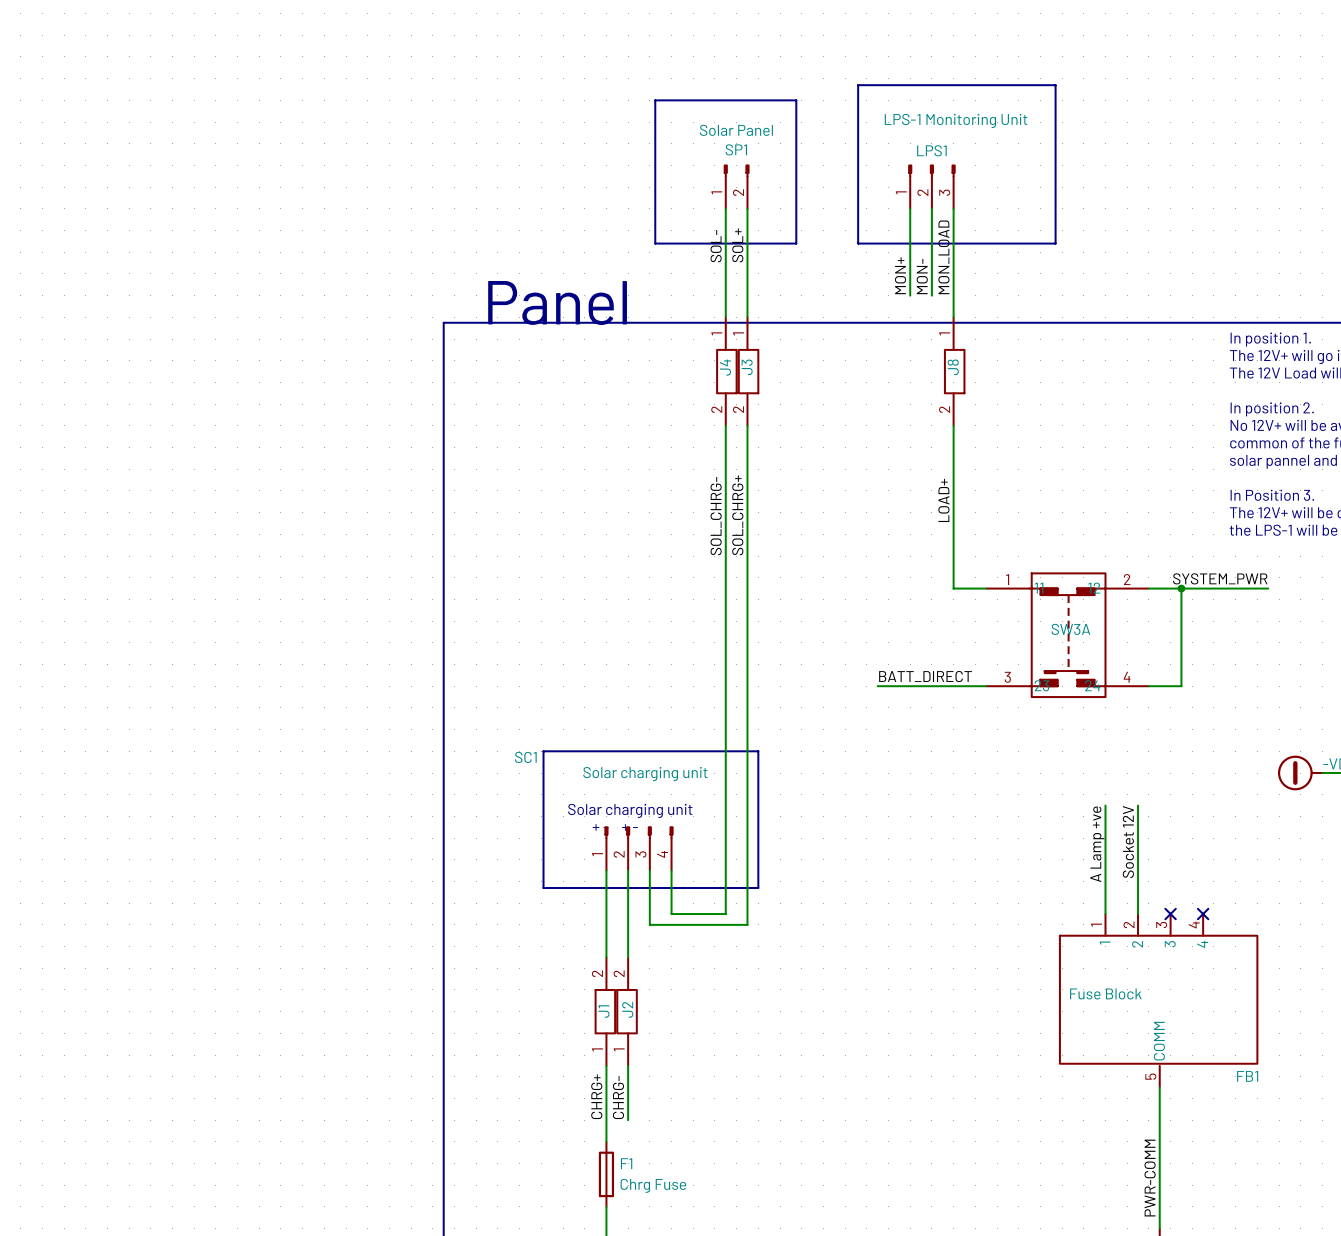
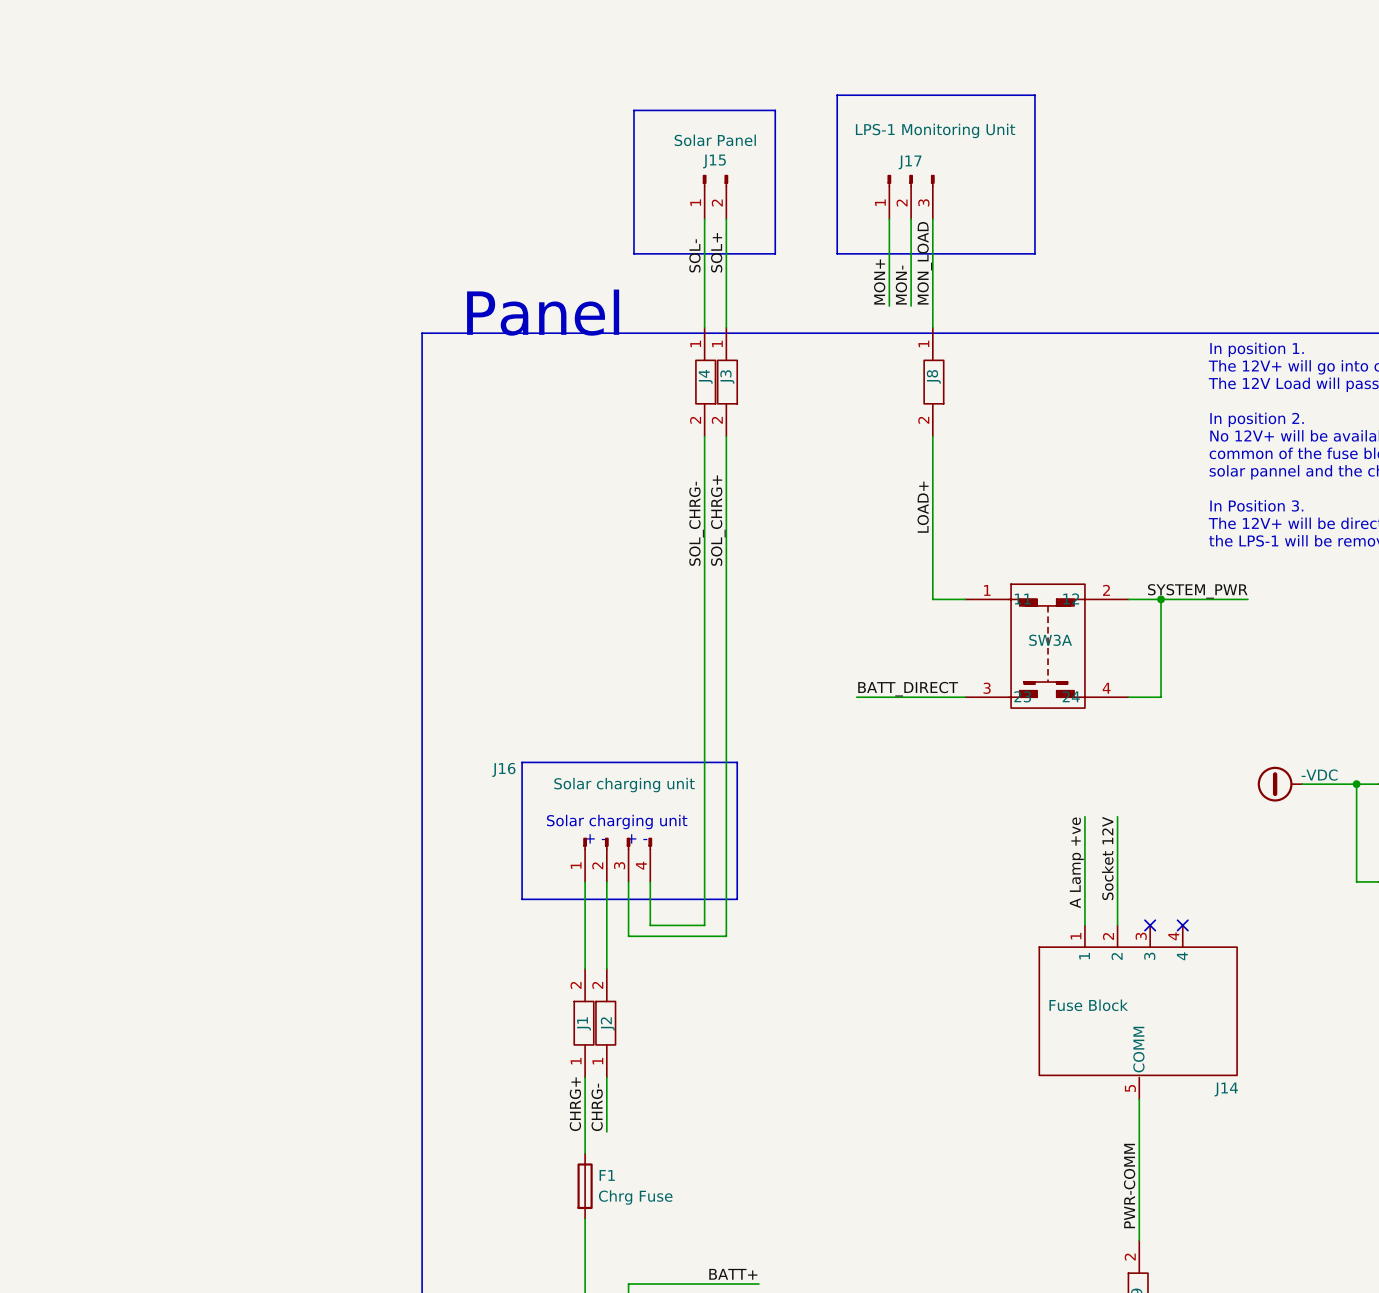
SP1 name: SP1 (736, 149) -> J15 (714, 161)
LPS1 name: LPS1 (931, 150) -> J17 (910, 162)
SC1 name: SC1 (525, 757) -> J16 (503, 769)
FB1 name: FB1 (1247, 1076) -> J14 (1226, 1089)

